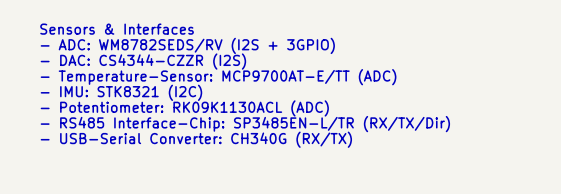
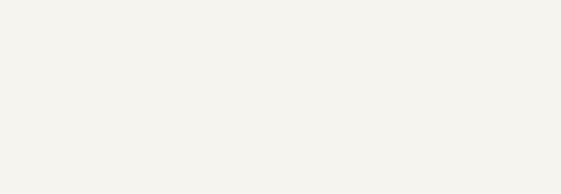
text: Sensors & Interfaces (117, 29) -> none
text: - ADC: WM8782SEDS/RV (I2S + 3GPIO) (187, 45) -> none
text: - DAC: CS4344-CZZR (I2S) (143, 61) -> none
text: - Temperature-Sensor: MCP9700AT-E/TT (ADC) (218, 77) -> none
text: - IMU: STK8321 (I2C) (121, 92) -> none
text: - Potentiometer: RK09K1130ACL (ADC) (184, 108) -> none
text: - RS485 Interface-Chip: SP3485EN-L/TR (RX/TX/Dir) (245, 124) -> none
text: - USB-Serial Converter: CH340G (RX/TX) (196, 139) -> none

